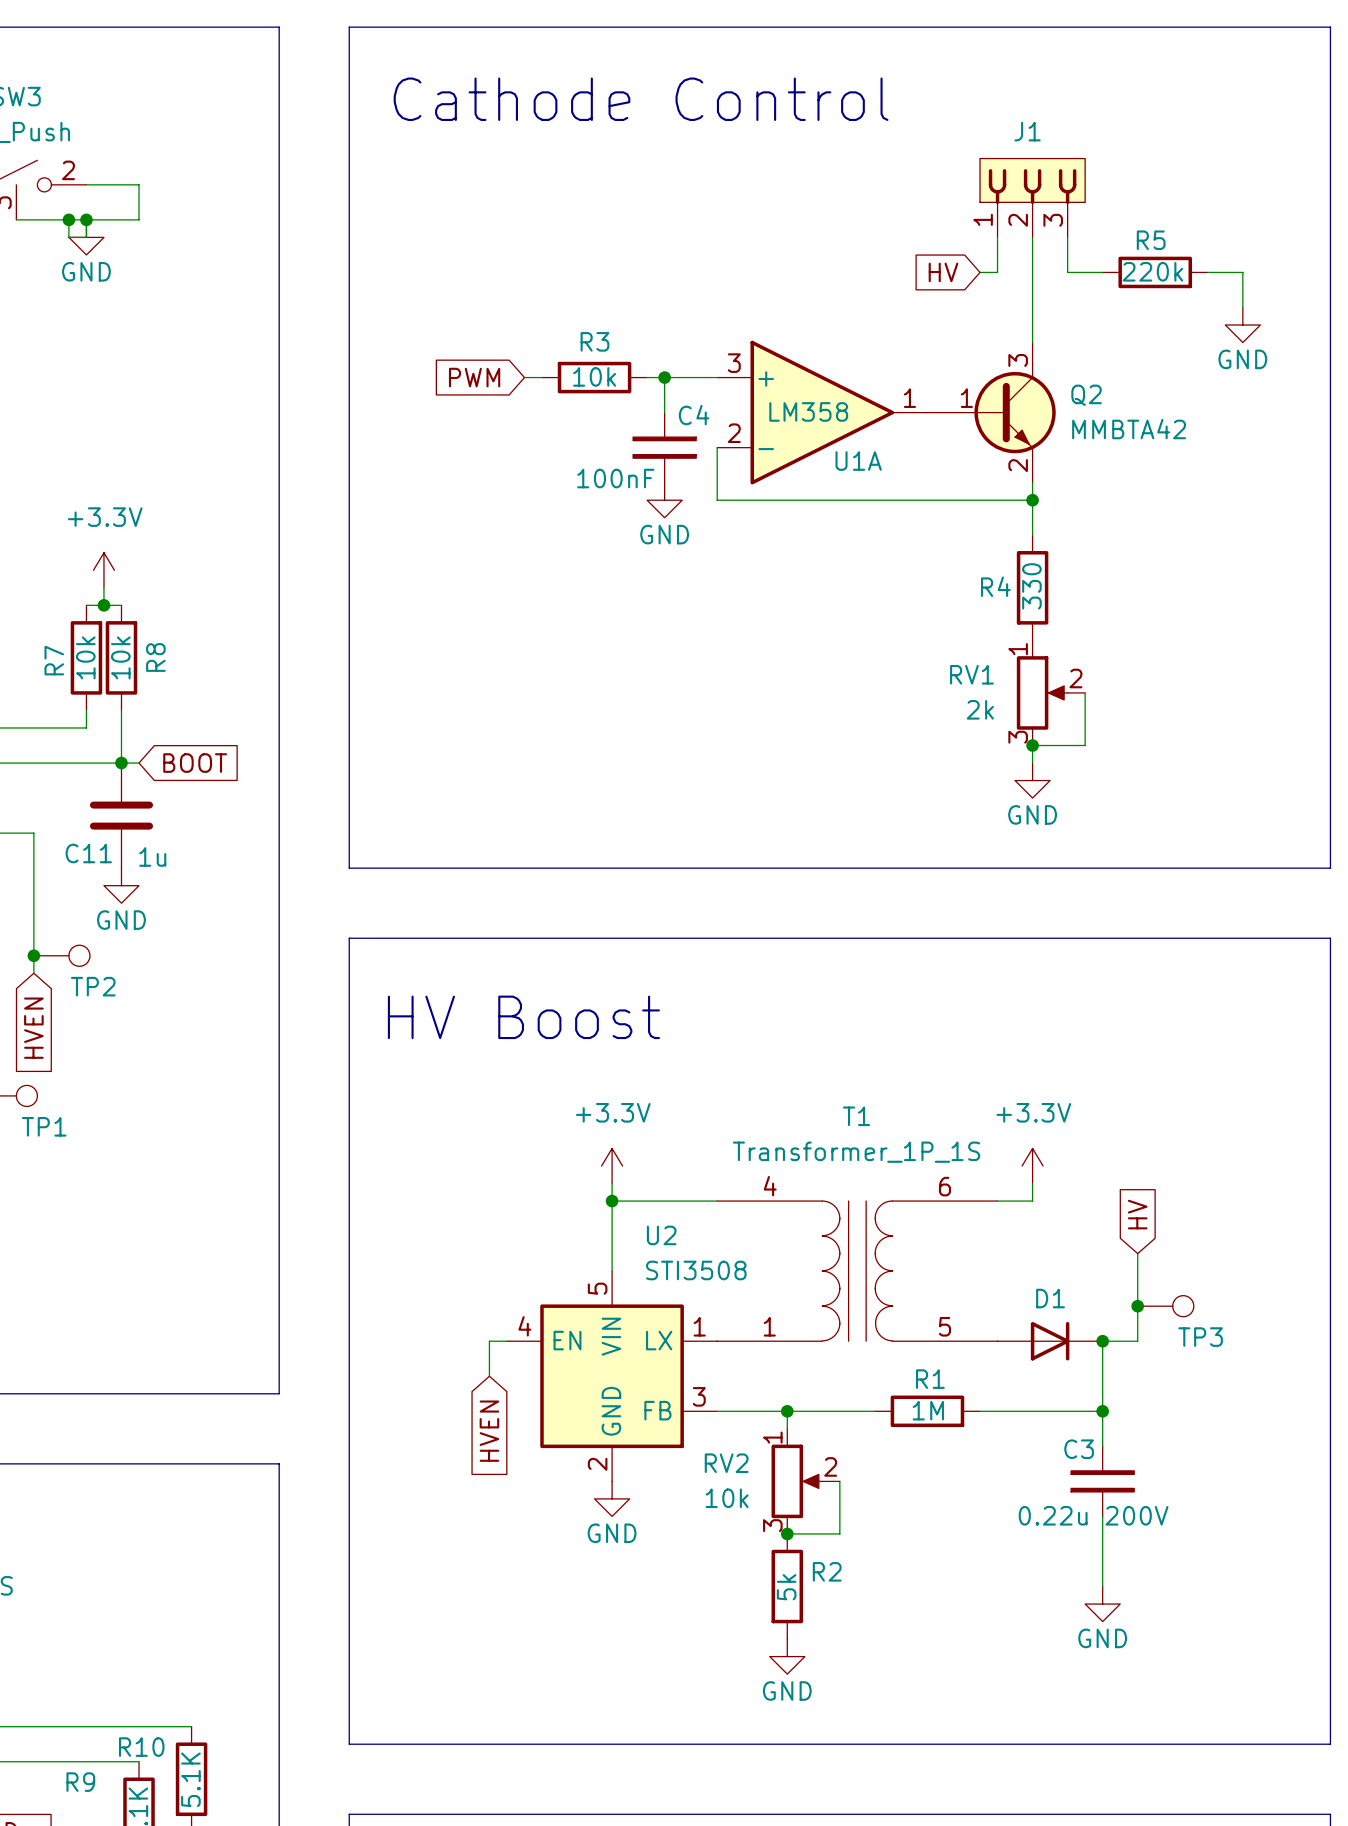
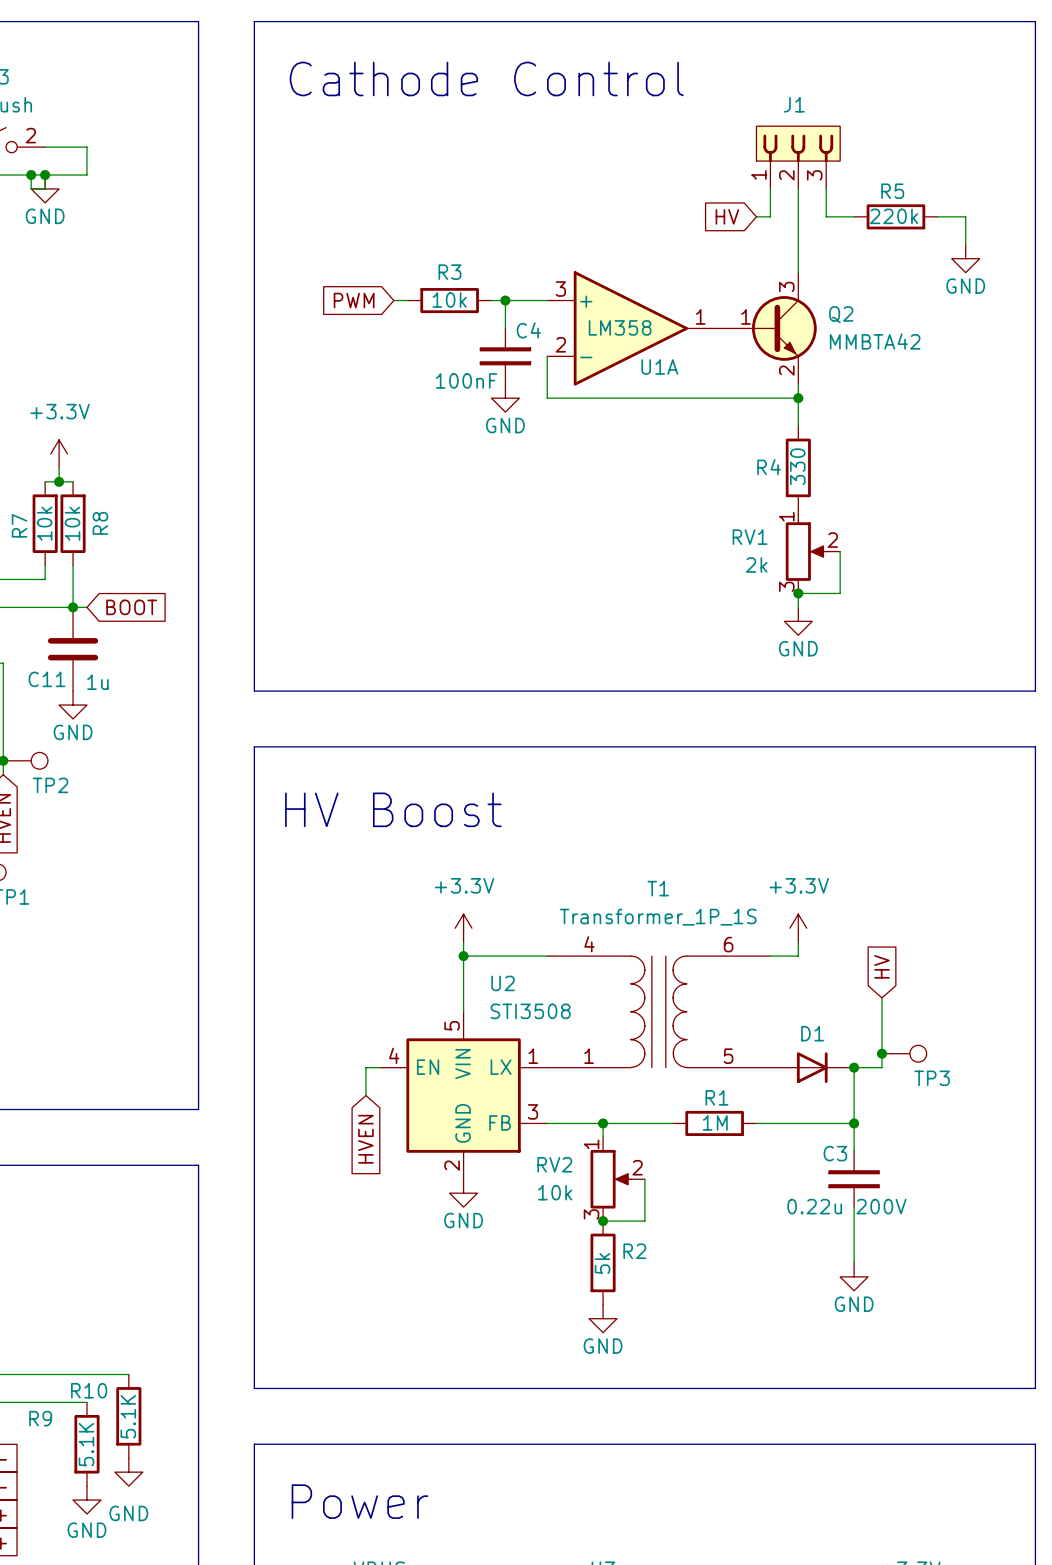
junction position: (1137, 1306) -> (882, 1053)
TP3 position: (1165, 1306) -> (904, 1053)

